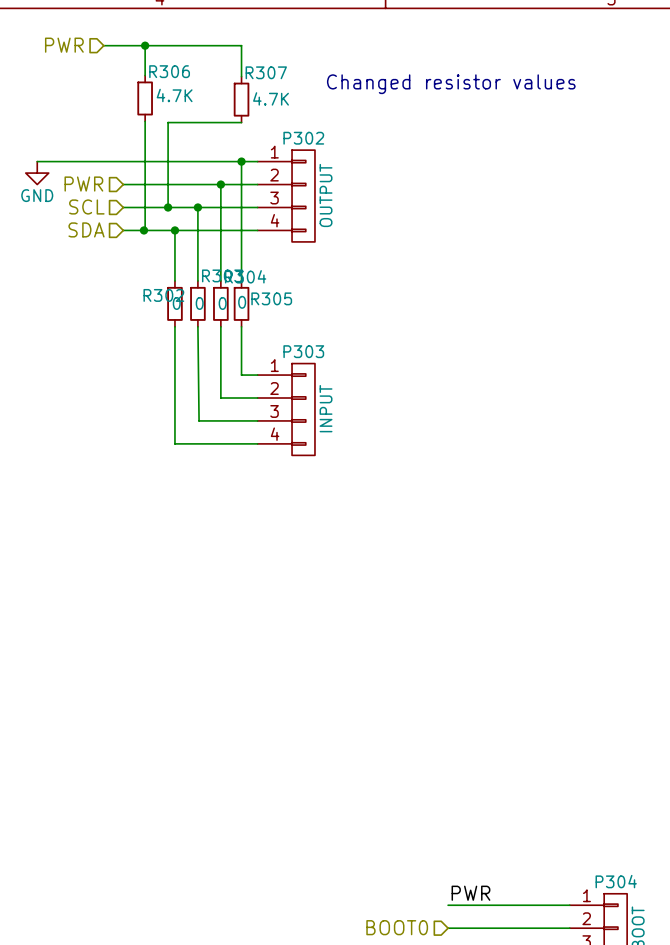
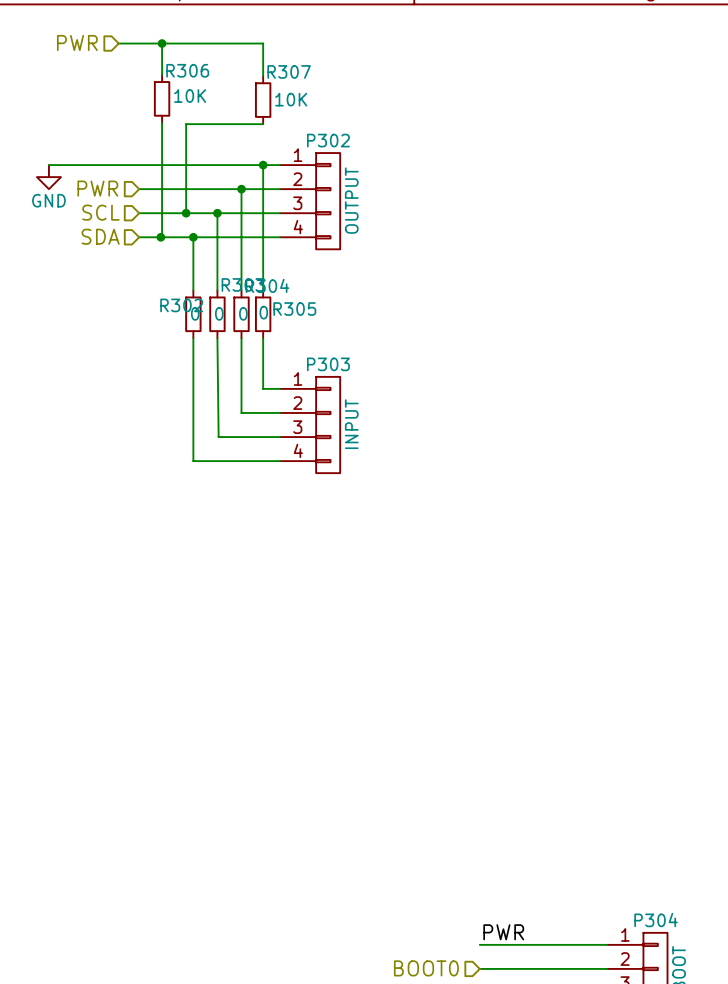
text: Changed resistor values (451, 84) -> none
R306 value: 4.7K (174, 95) -> 10K (190, 96)
R307 value: 4.7K (271, 98) -> 10K (291, 99)

